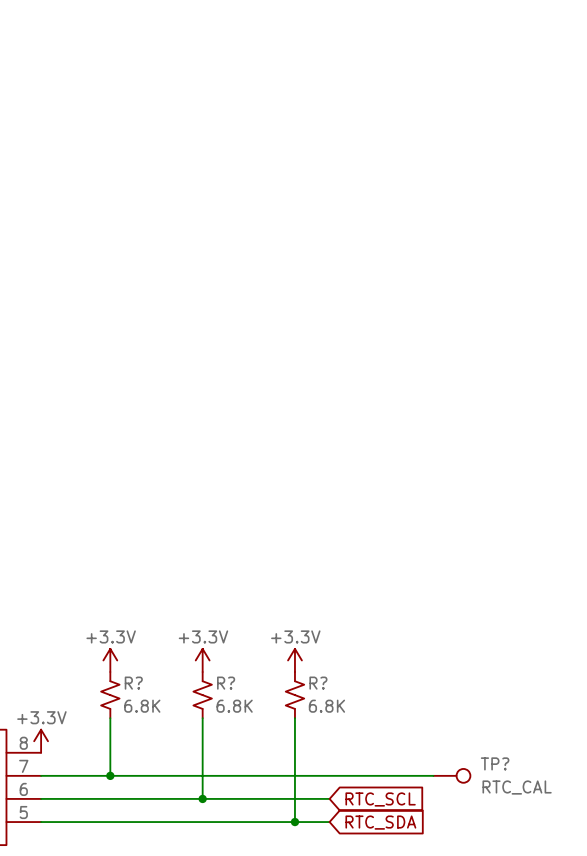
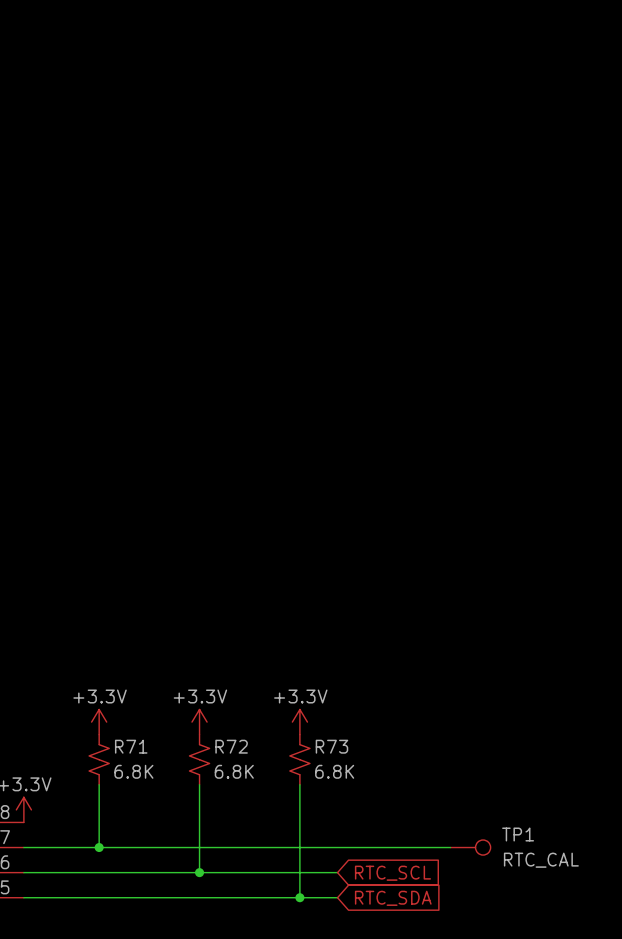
R? name: R? (133, 683) -> R71 (131, 746)
R? name: R? (226, 683) -> R72 (231, 746)
R? name: R? (318, 683) -> R73 (331, 746)
TP? name: TP? (495, 763) -> TP1 (518, 834)

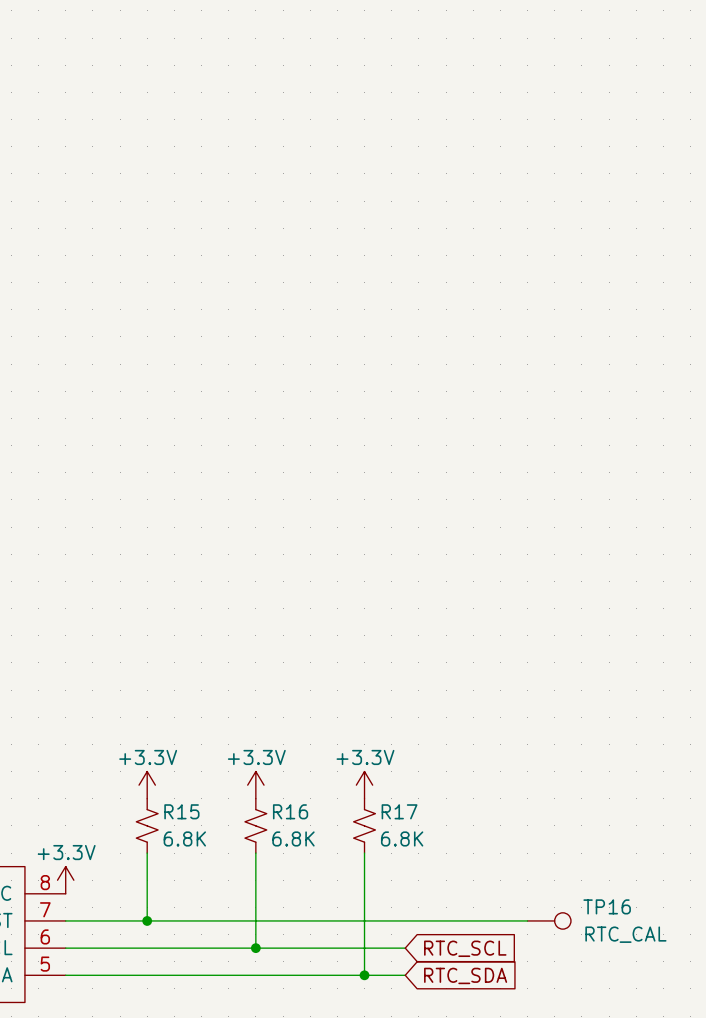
R71 name: R71 (131, 746) -> R15 (181, 811)
R72 name: R72 (231, 746) -> R16 (290, 811)
R73 name: R73 (331, 746) -> R17 (399, 811)
TP1 name: TP1 (518, 834) -> TP16 (607, 906)

